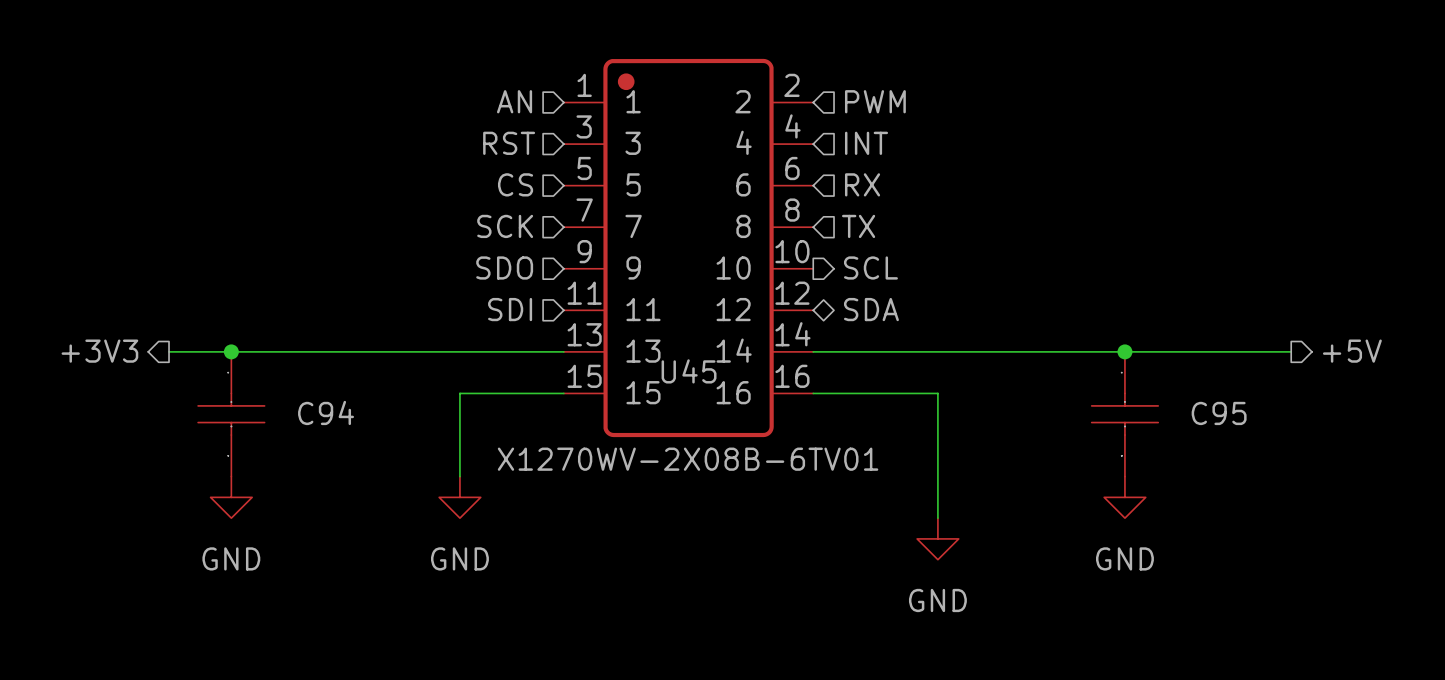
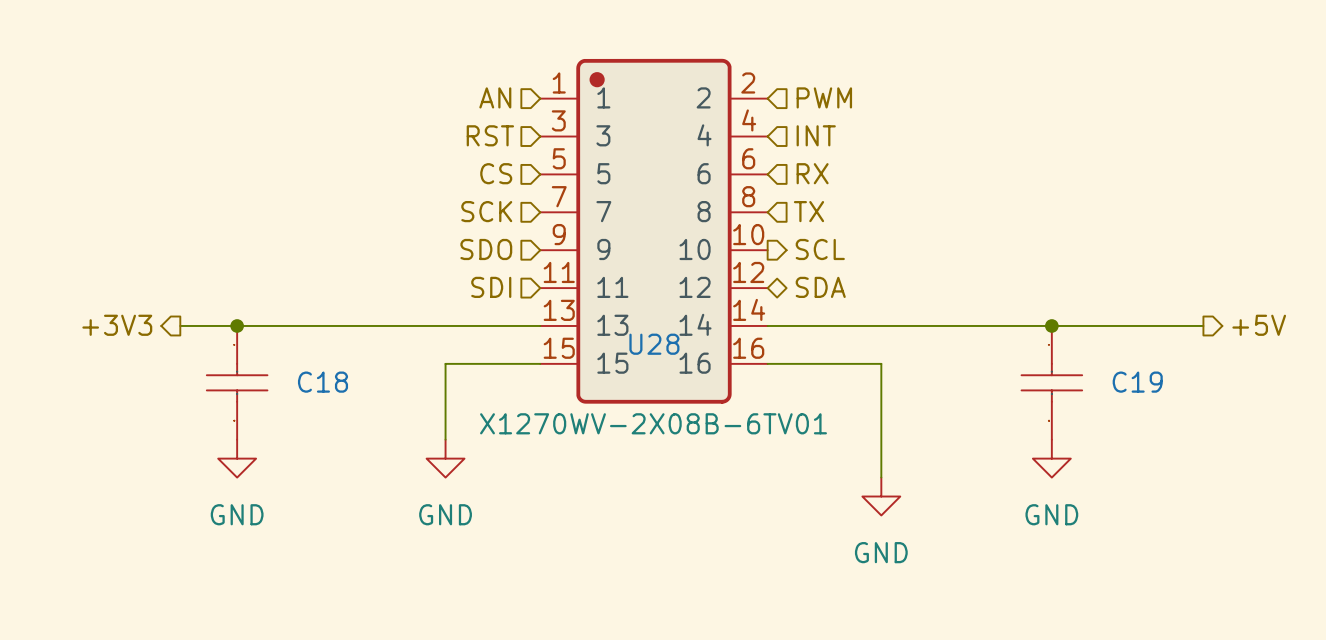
U45 name: U45 (689, 371) -> U28 (654, 344)
C94 name: C94 (326, 412) -> C18 (322, 382)
C95 name: C95 (1219, 413) -> C19 (1137, 382)

